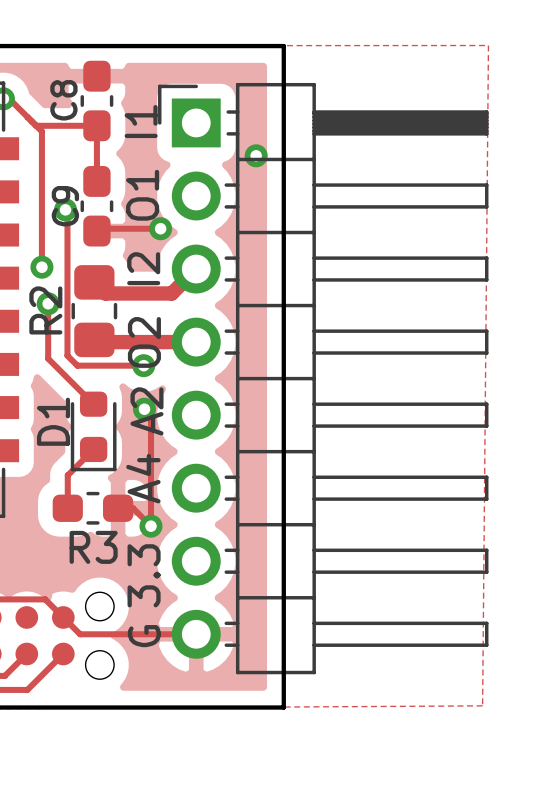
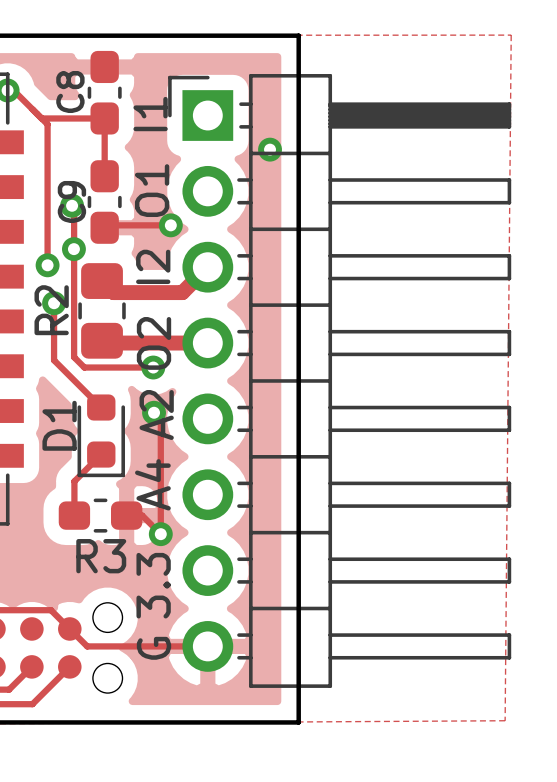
via: none -> (73, 249)

